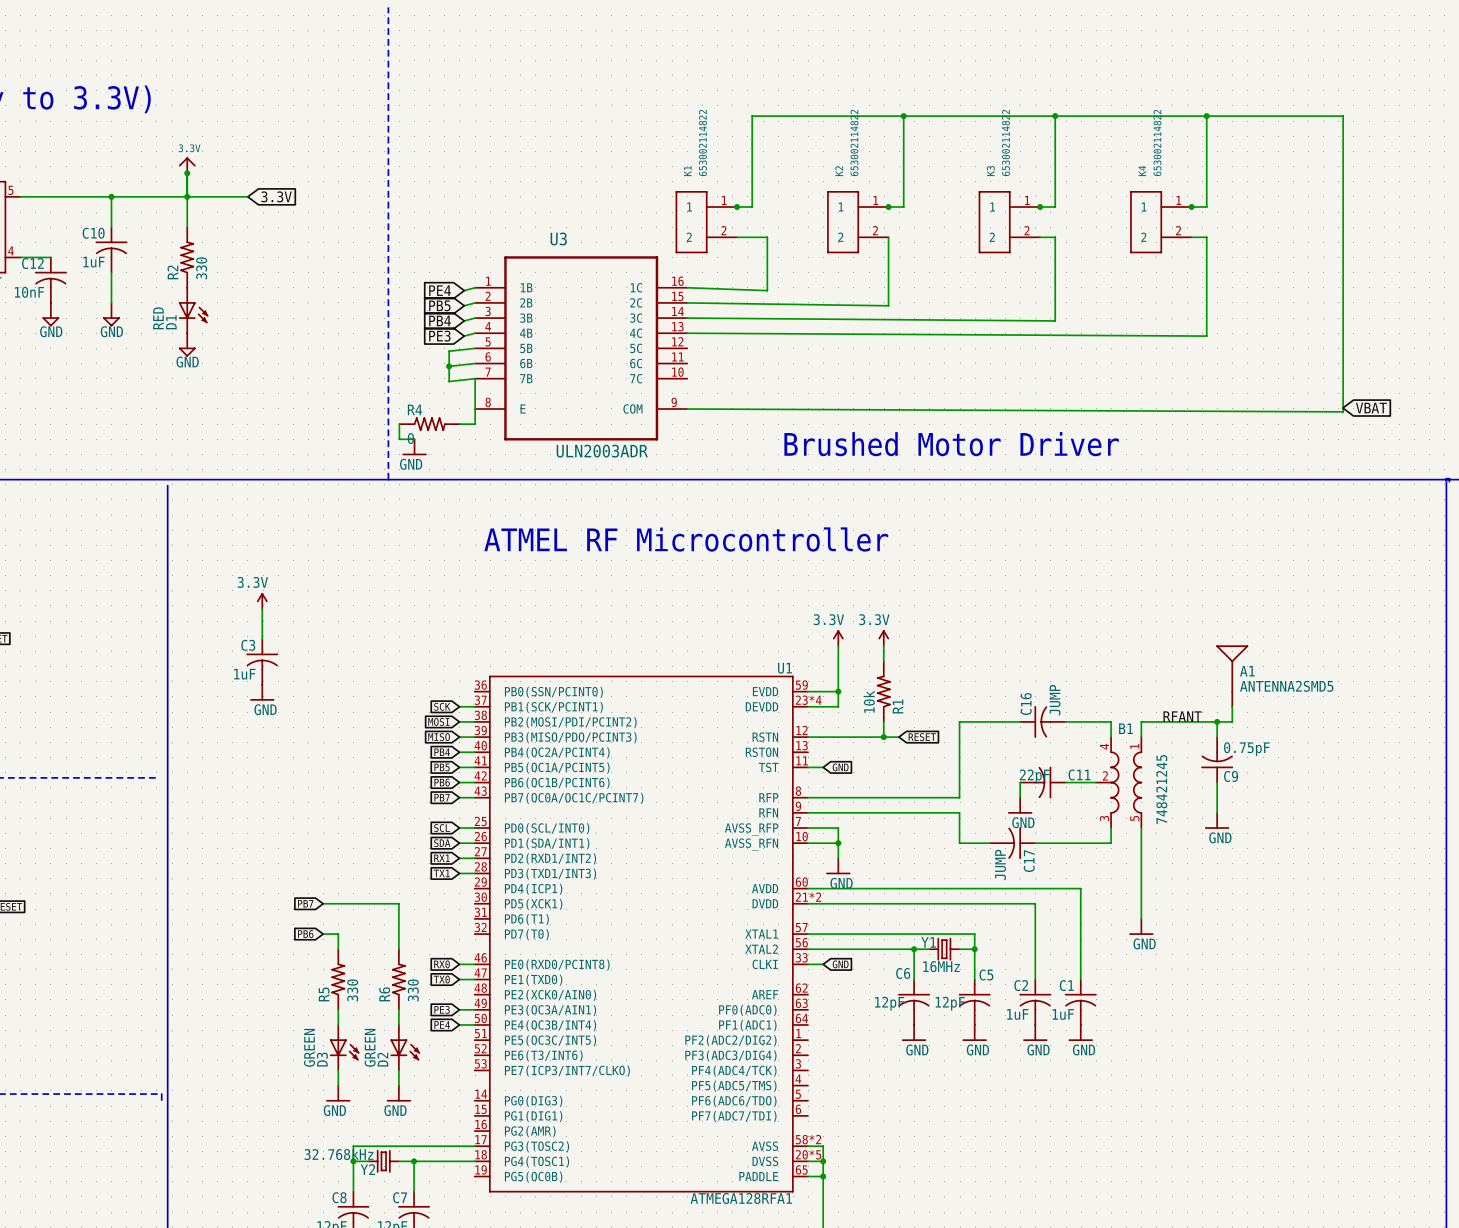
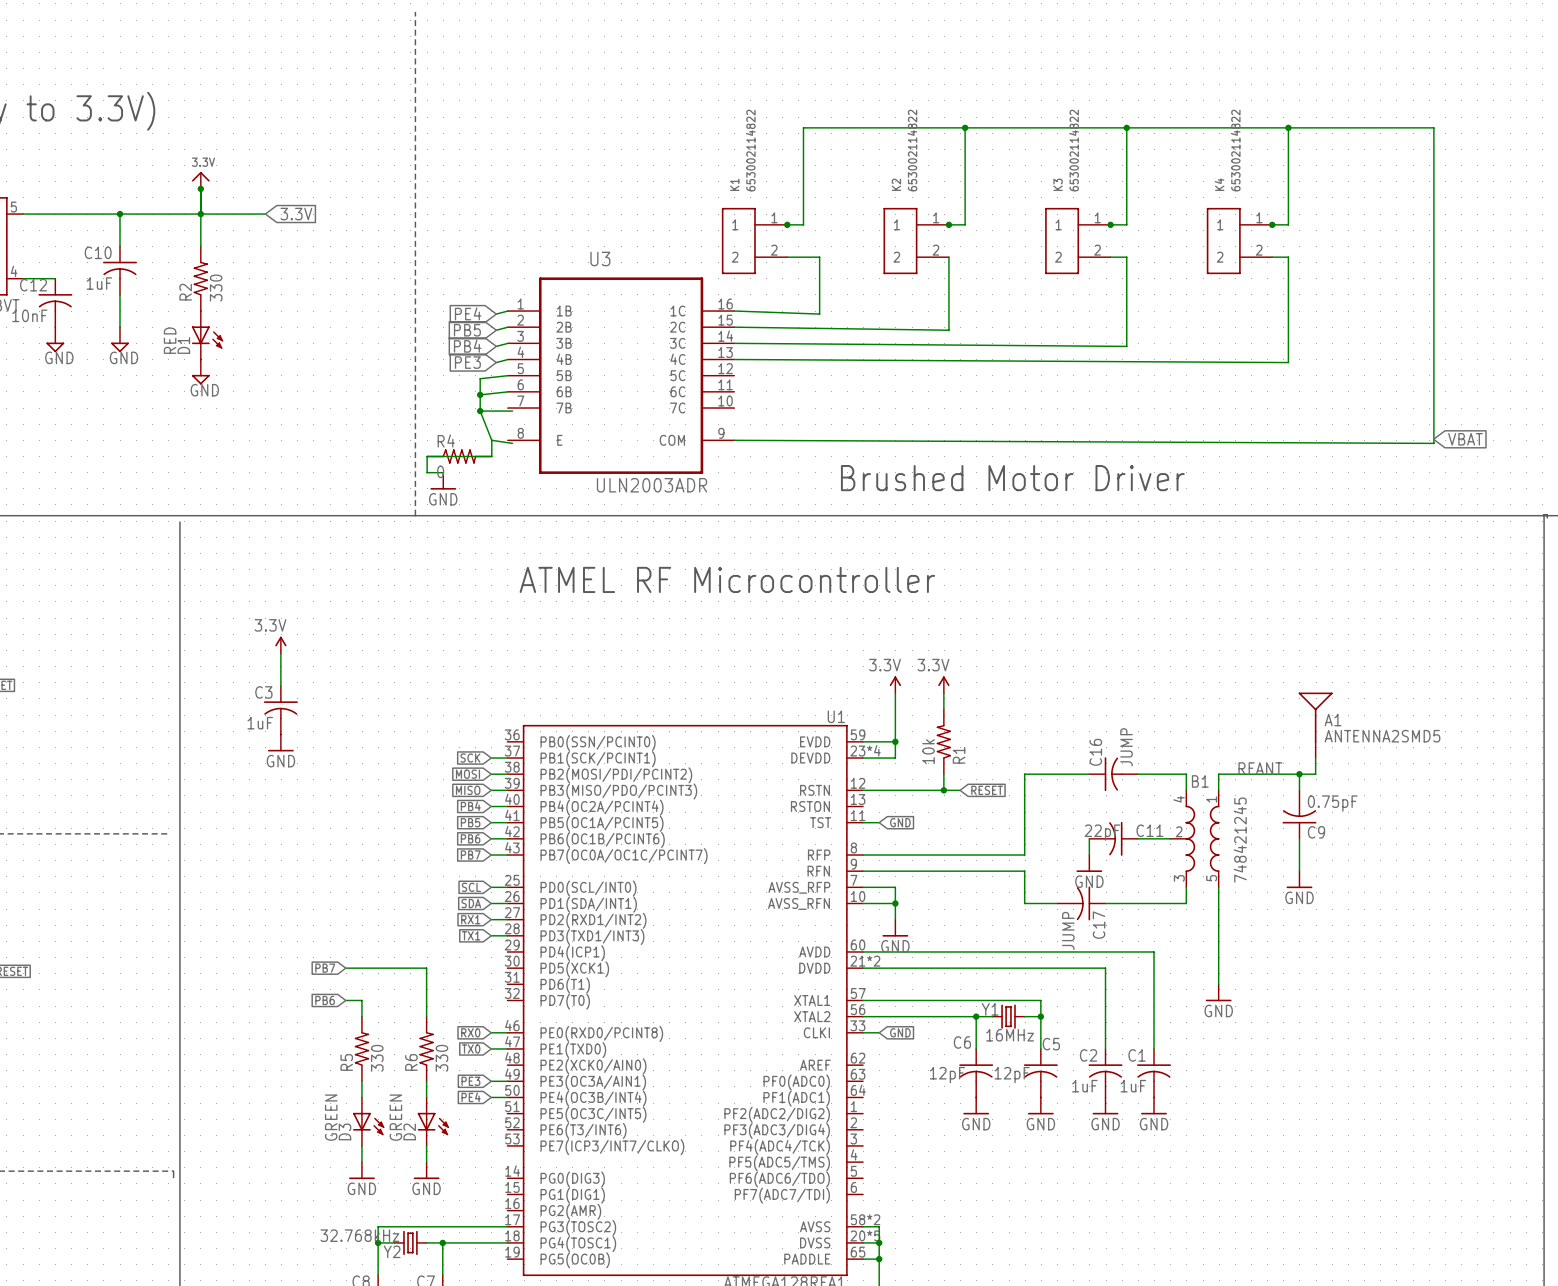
wire: (449, 381) (475, 378) (475, 424) (459, 424) -> none
junction: none -> (480, 411)
wire: none -> (512, 411) (480, 411) (491, 440)
wire: none -> (491, 440) (512, 443)
wire: none -> (491, 440) (491, 456) (427, 456)

